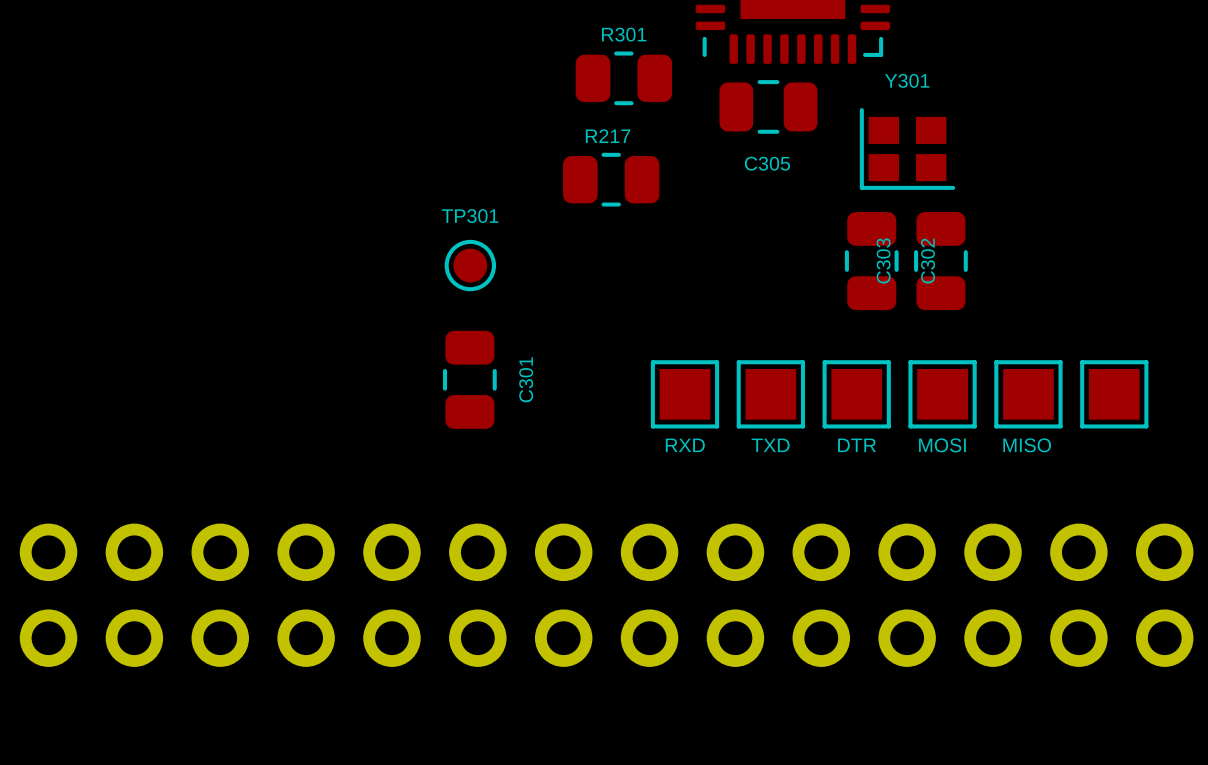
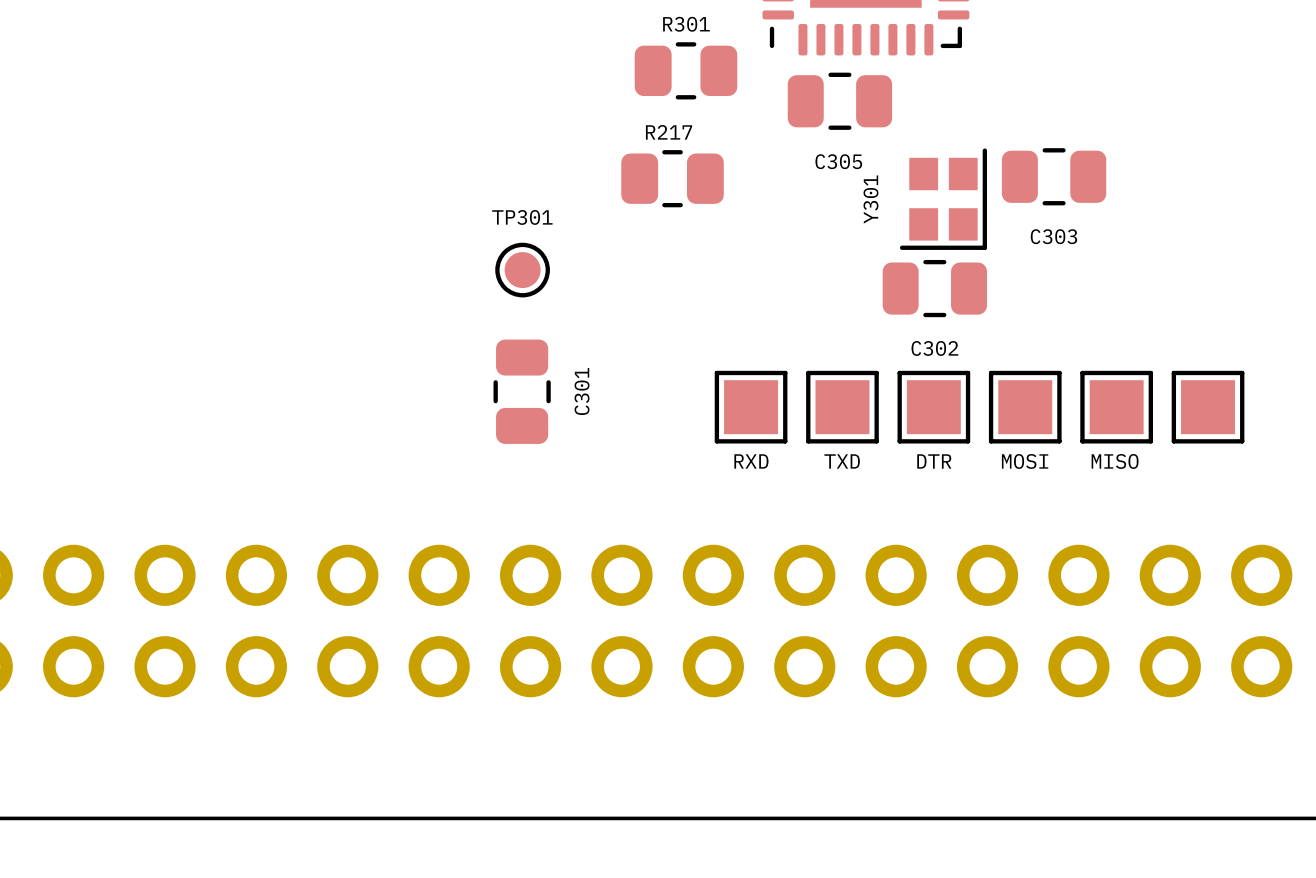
Y301 rotation: 0° (907, 149) -> 90° counterclockwise (943, 199)
Y301 position: (907, 149) -> (943, 199)
C303 name position: C303 (883, 260) -> C303 (1053, 236)
C302 rotation: 0° (871, 261) -> 90° clockwise (934, 288)
C303 rotation: 0° (940, 261) -> 90° clockwise (1054, 176)
C303 position: (940, 261) -> (1054, 176)

